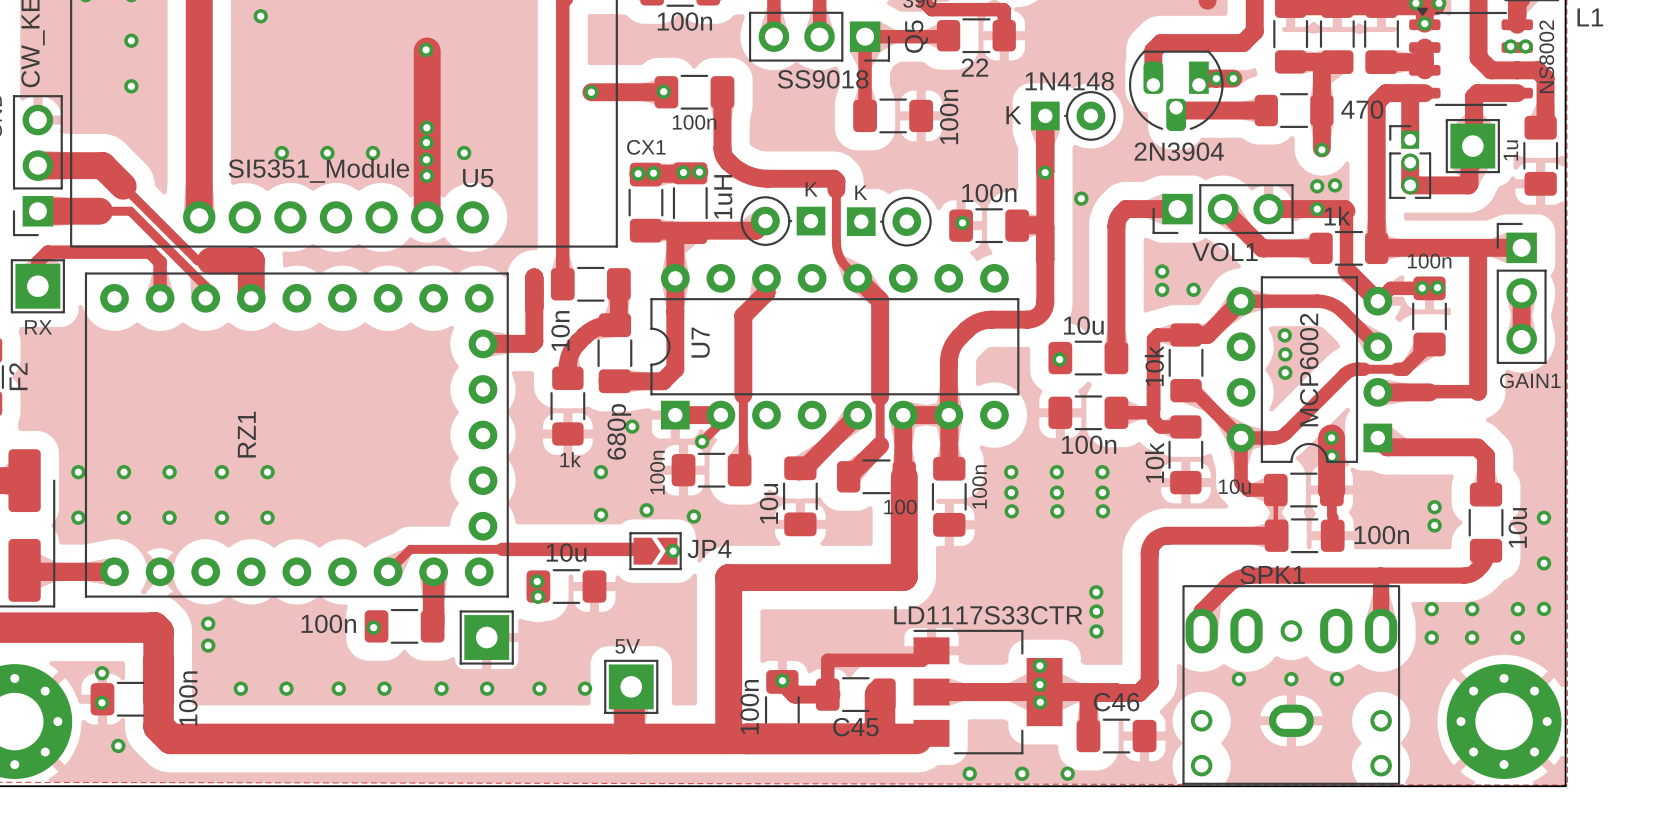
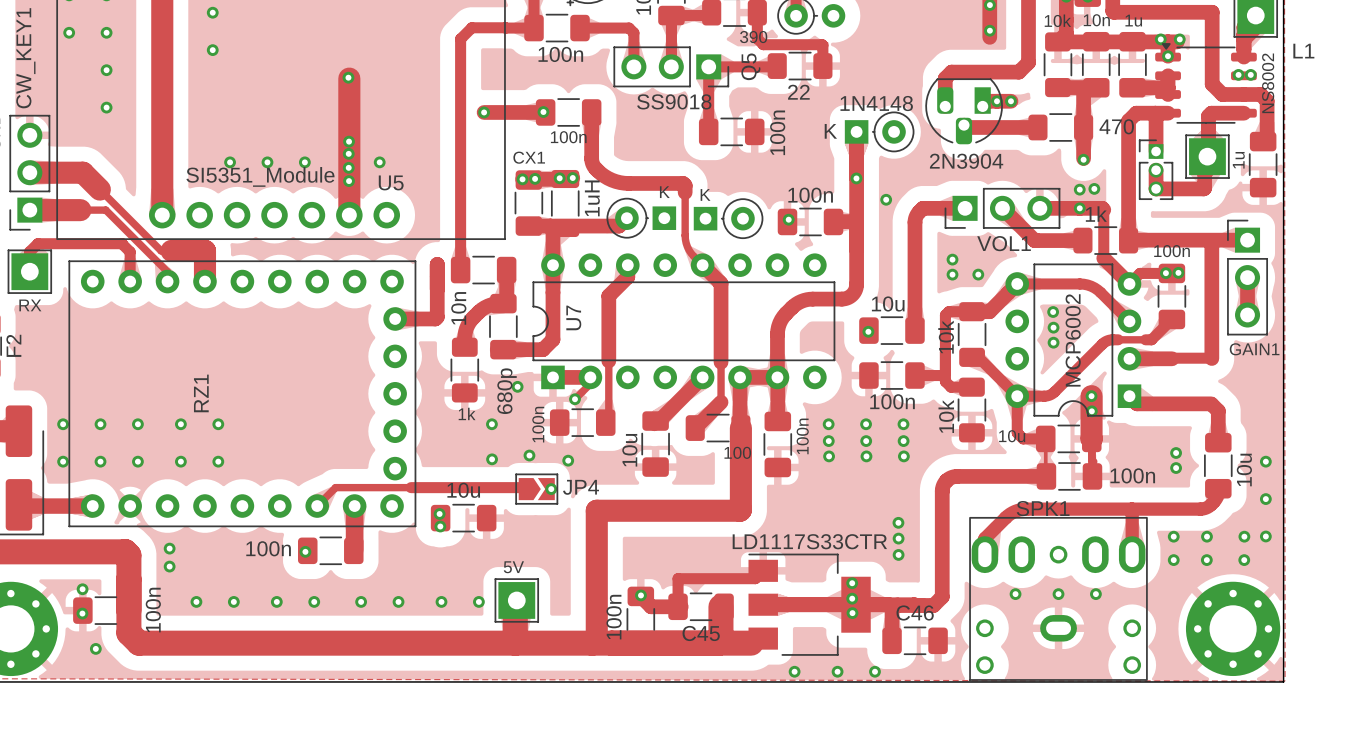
part: (486, 637) -> none

